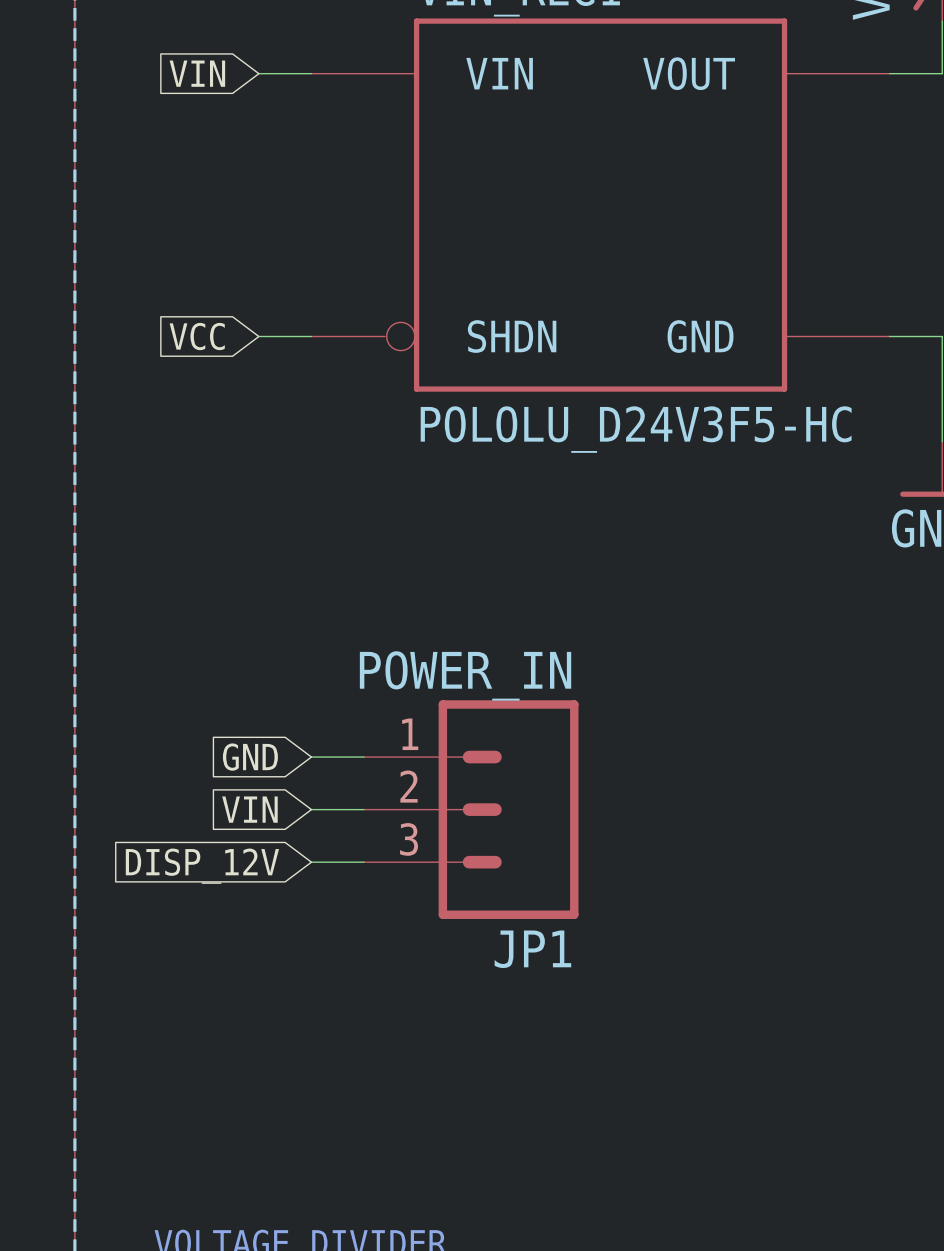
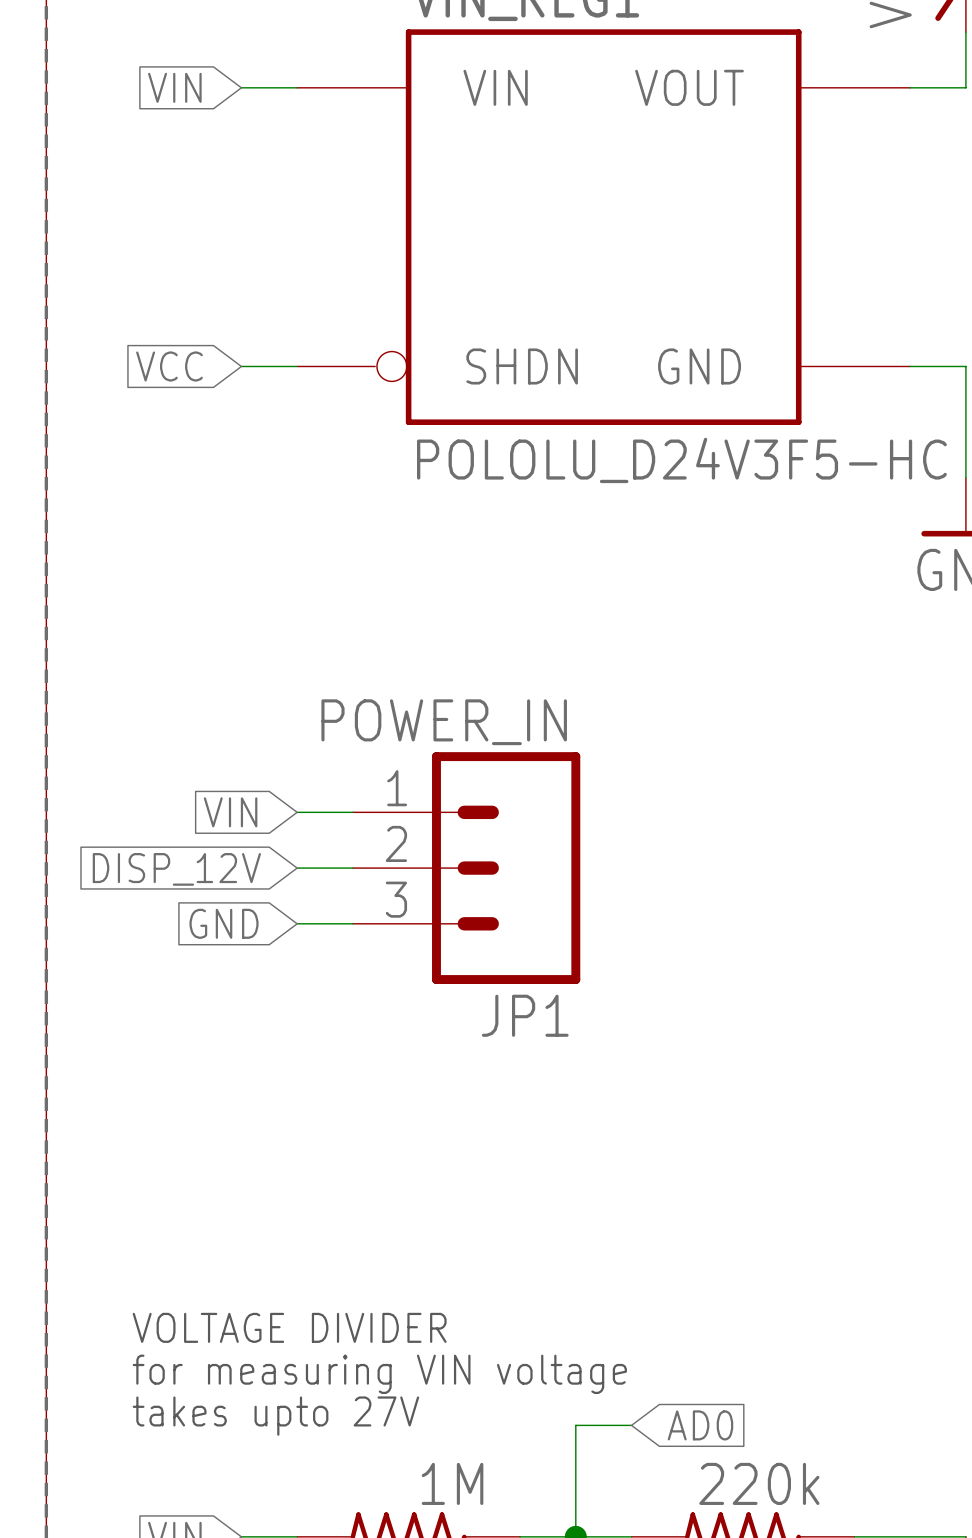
global label: GND (250, 757) -> VIN (230, 812)
global label: VIN (249, 809) -> DISP_12V (176, 869)
global label: DISP_12V (202, 866) -> GND (224, 923)

